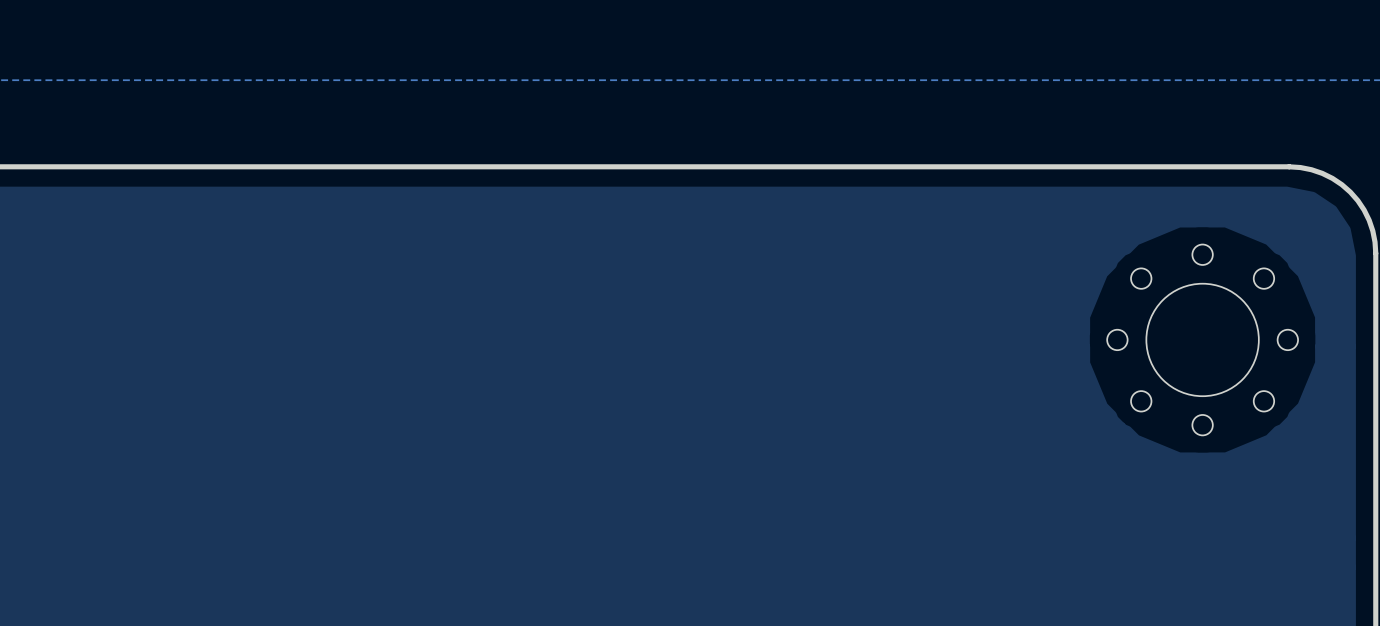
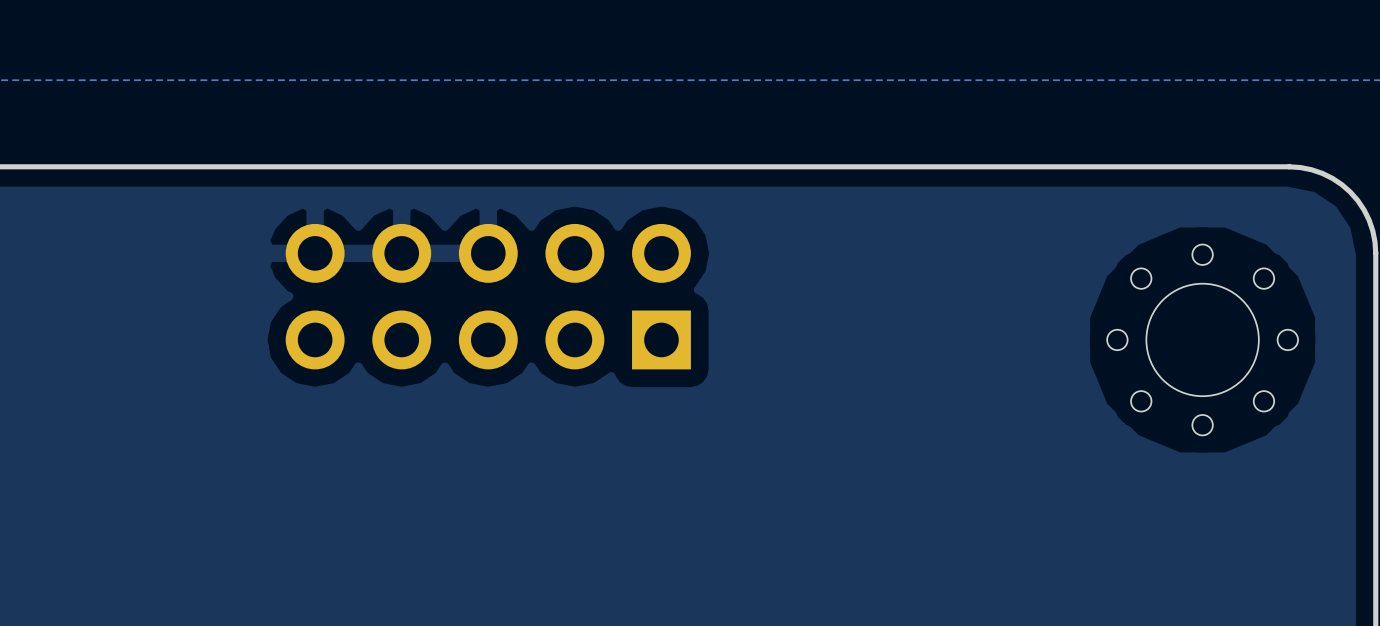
part: none -> (488, 296)

